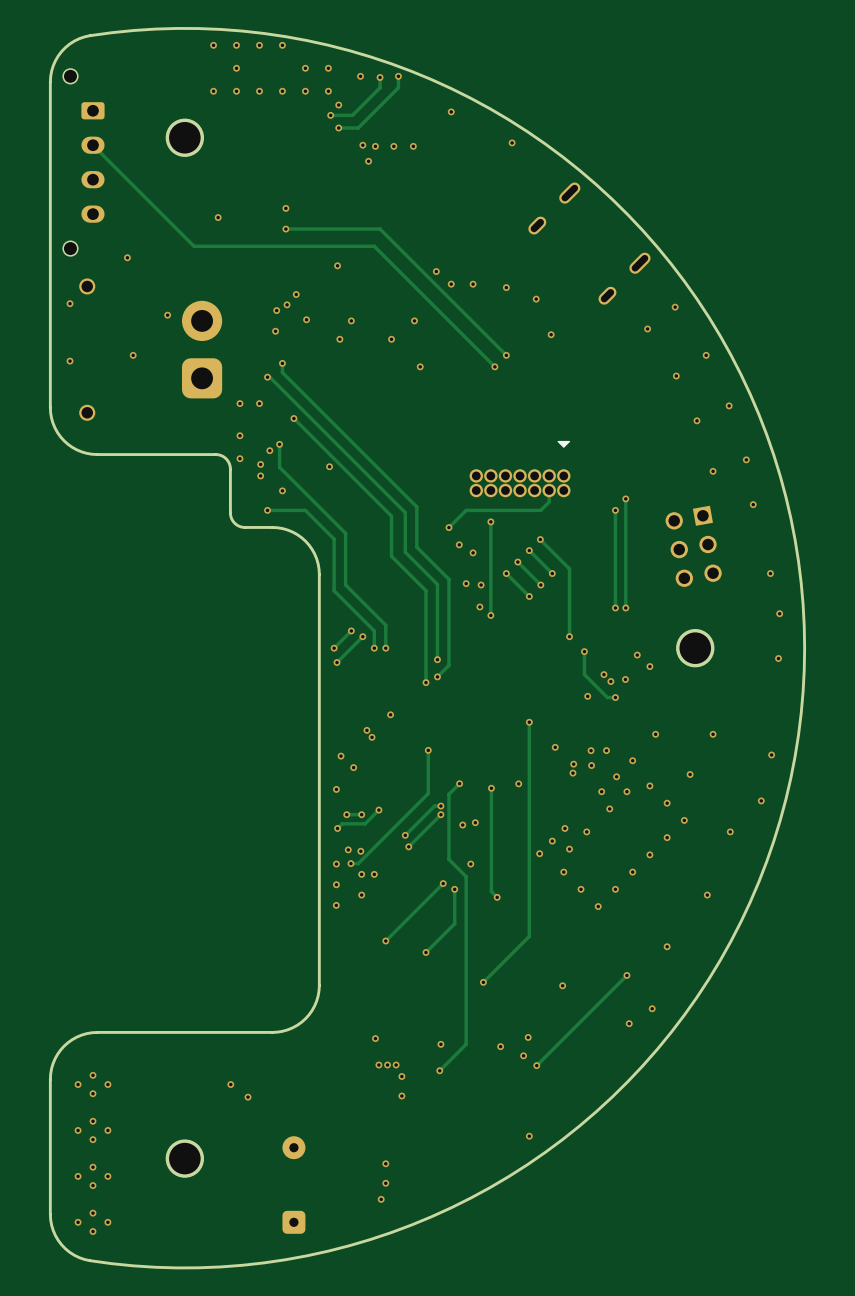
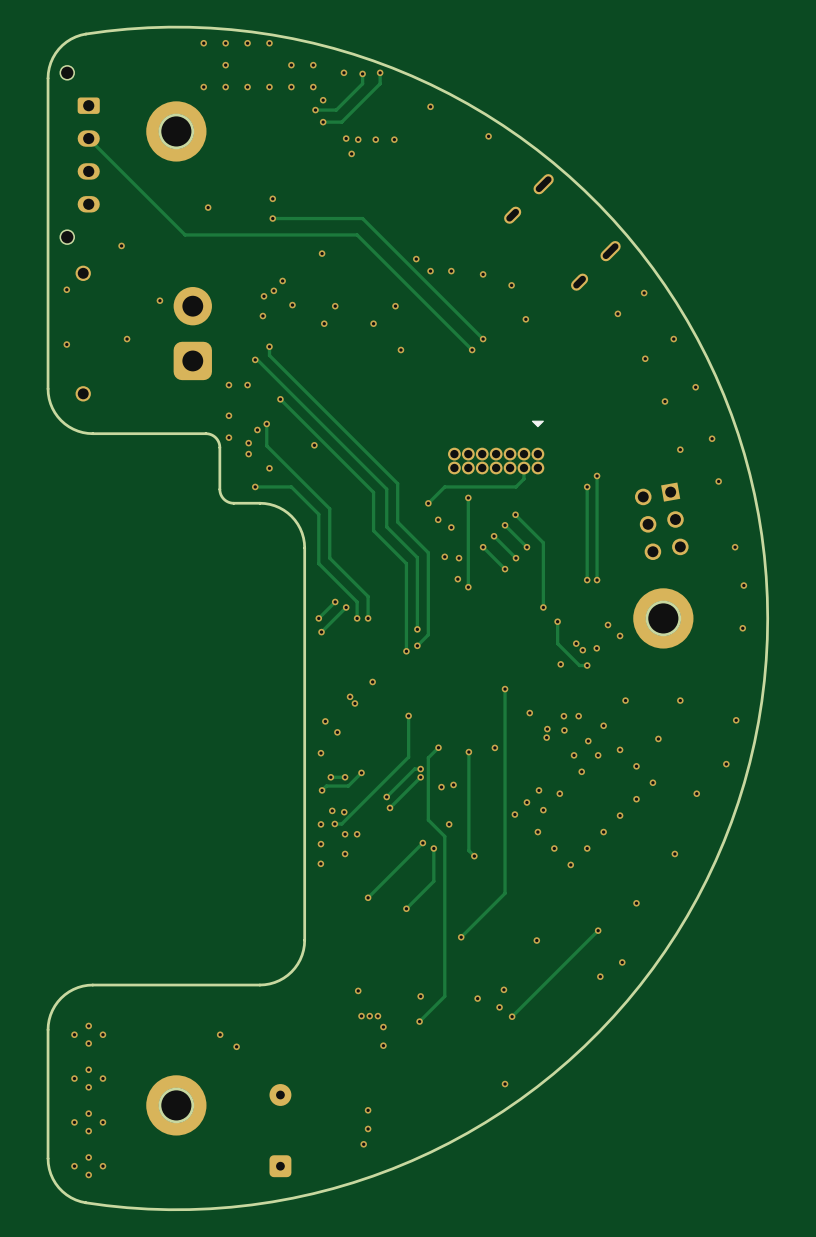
part footprint: [166, 119, 204, 157] -> [146, 101, 207, 162]
part footprint: [676, 629, 714, 667] -> [633, 588, 694, 649]
part footprint: [166, 1140, 204, 1177] -> [146, 1075, 207, 1136]

